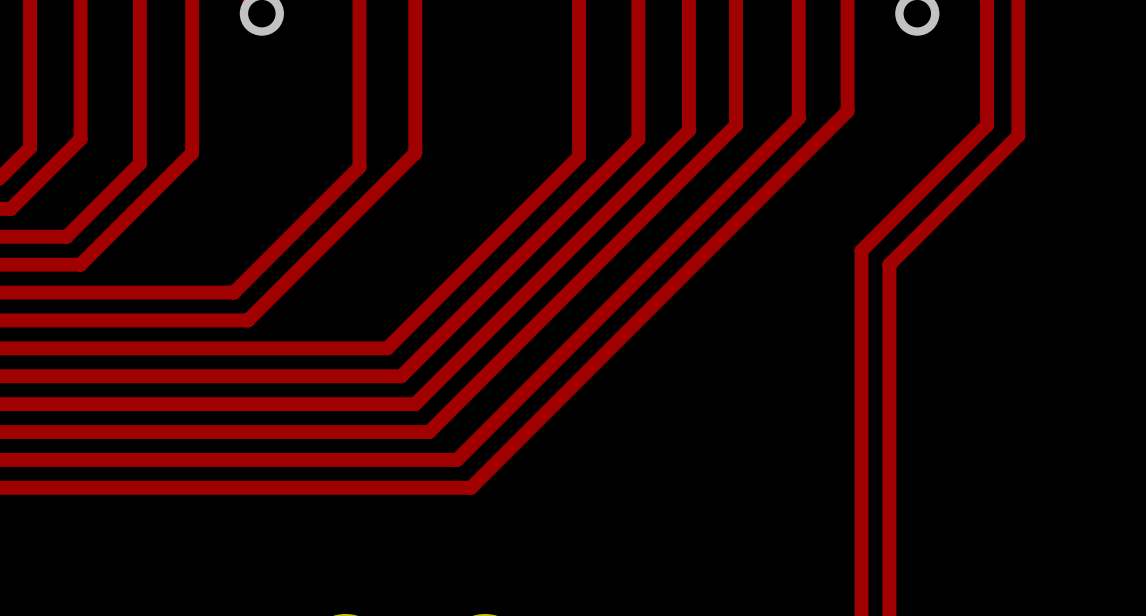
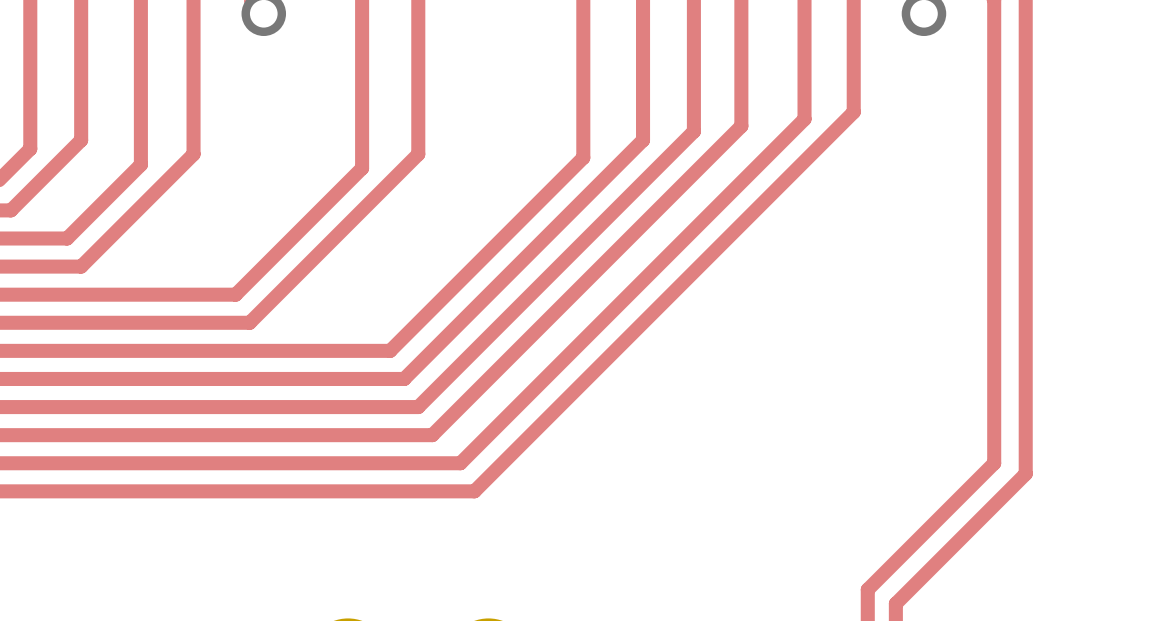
top track: (987, 125) (861, 250) (861, 585) -> (994, 126) (994, 463) (867, 589)
top track: (1018, 135) (889, 264) (889, 599) -> (1025, 136) (1025, 473) (895, 603)

